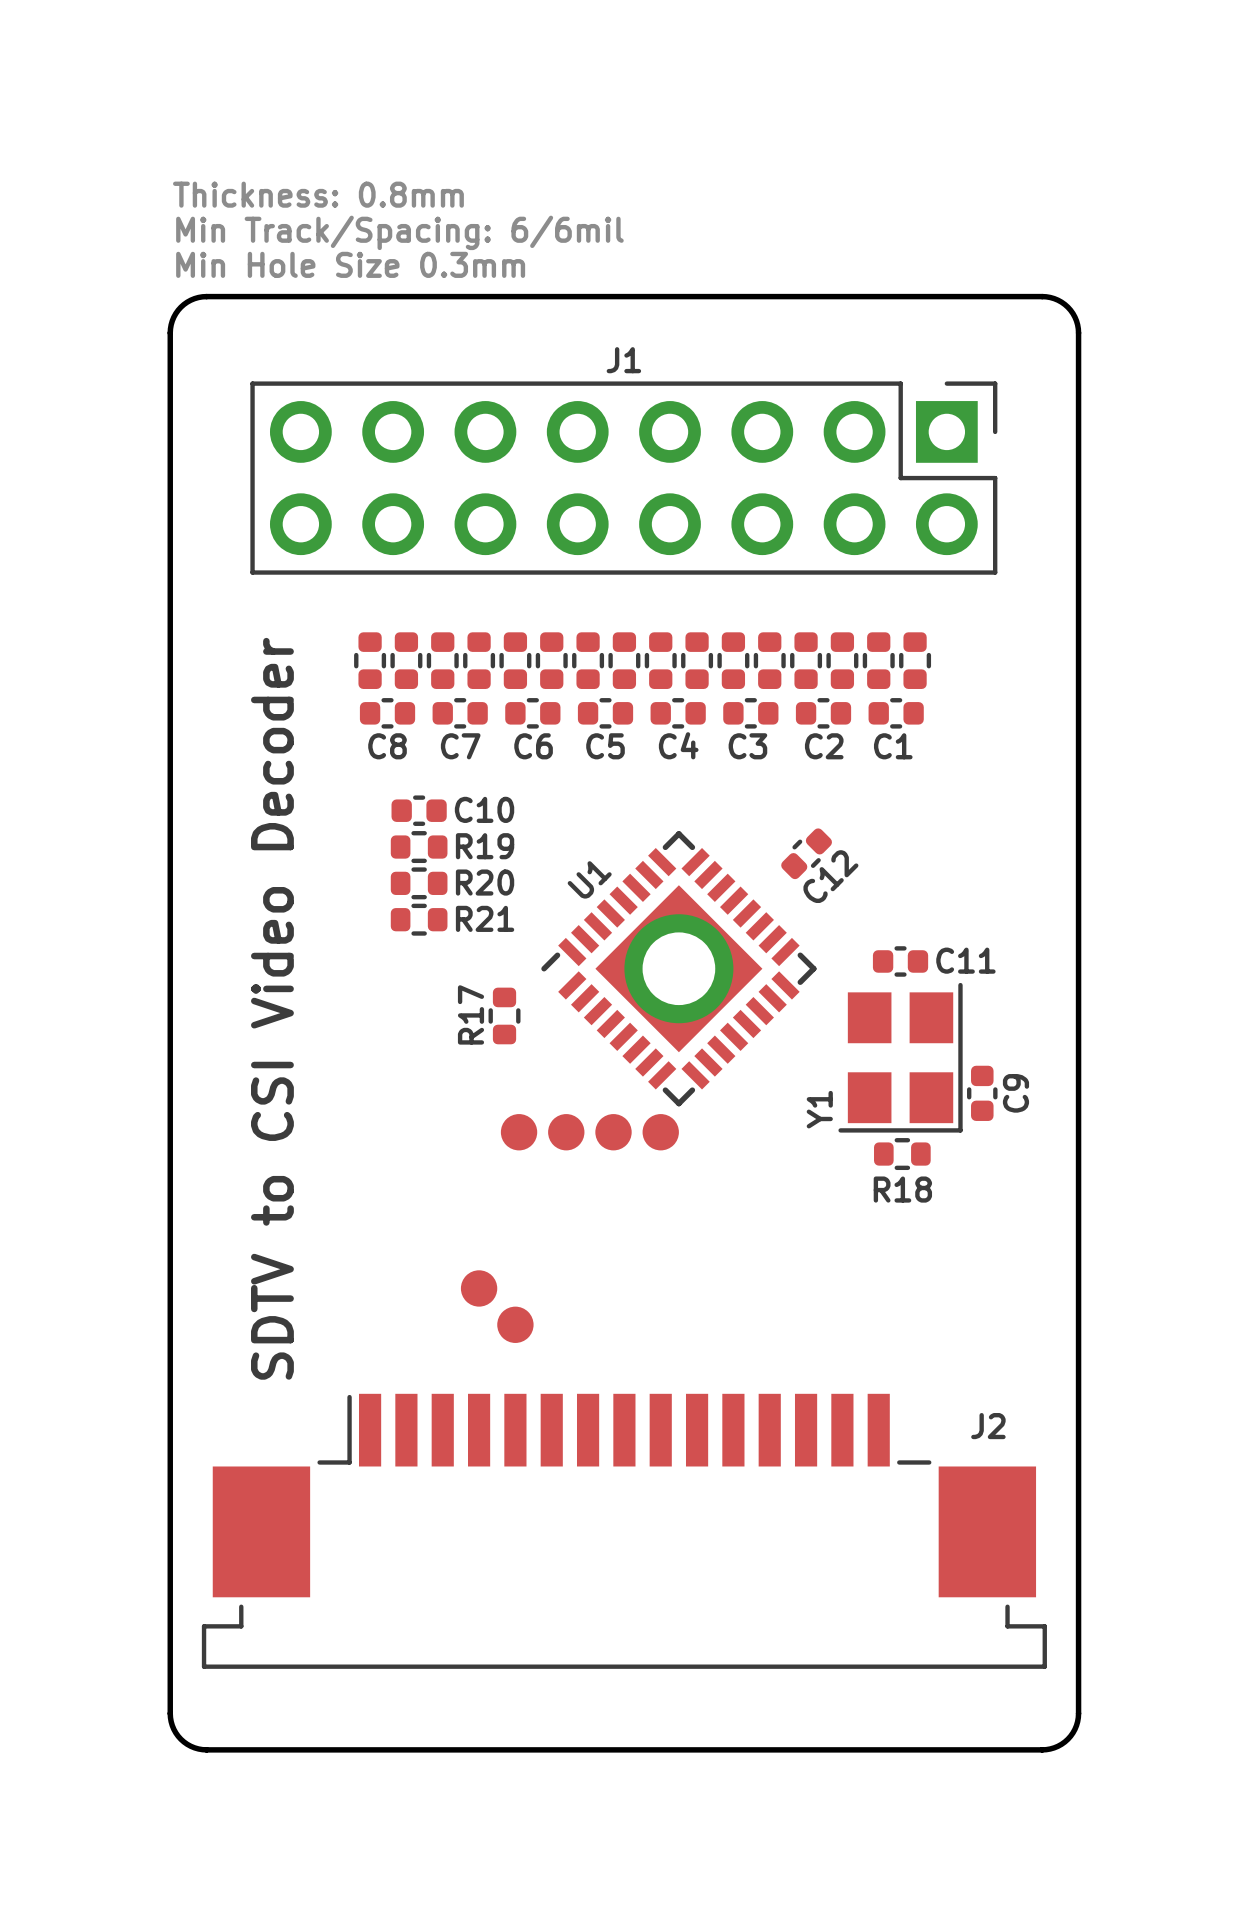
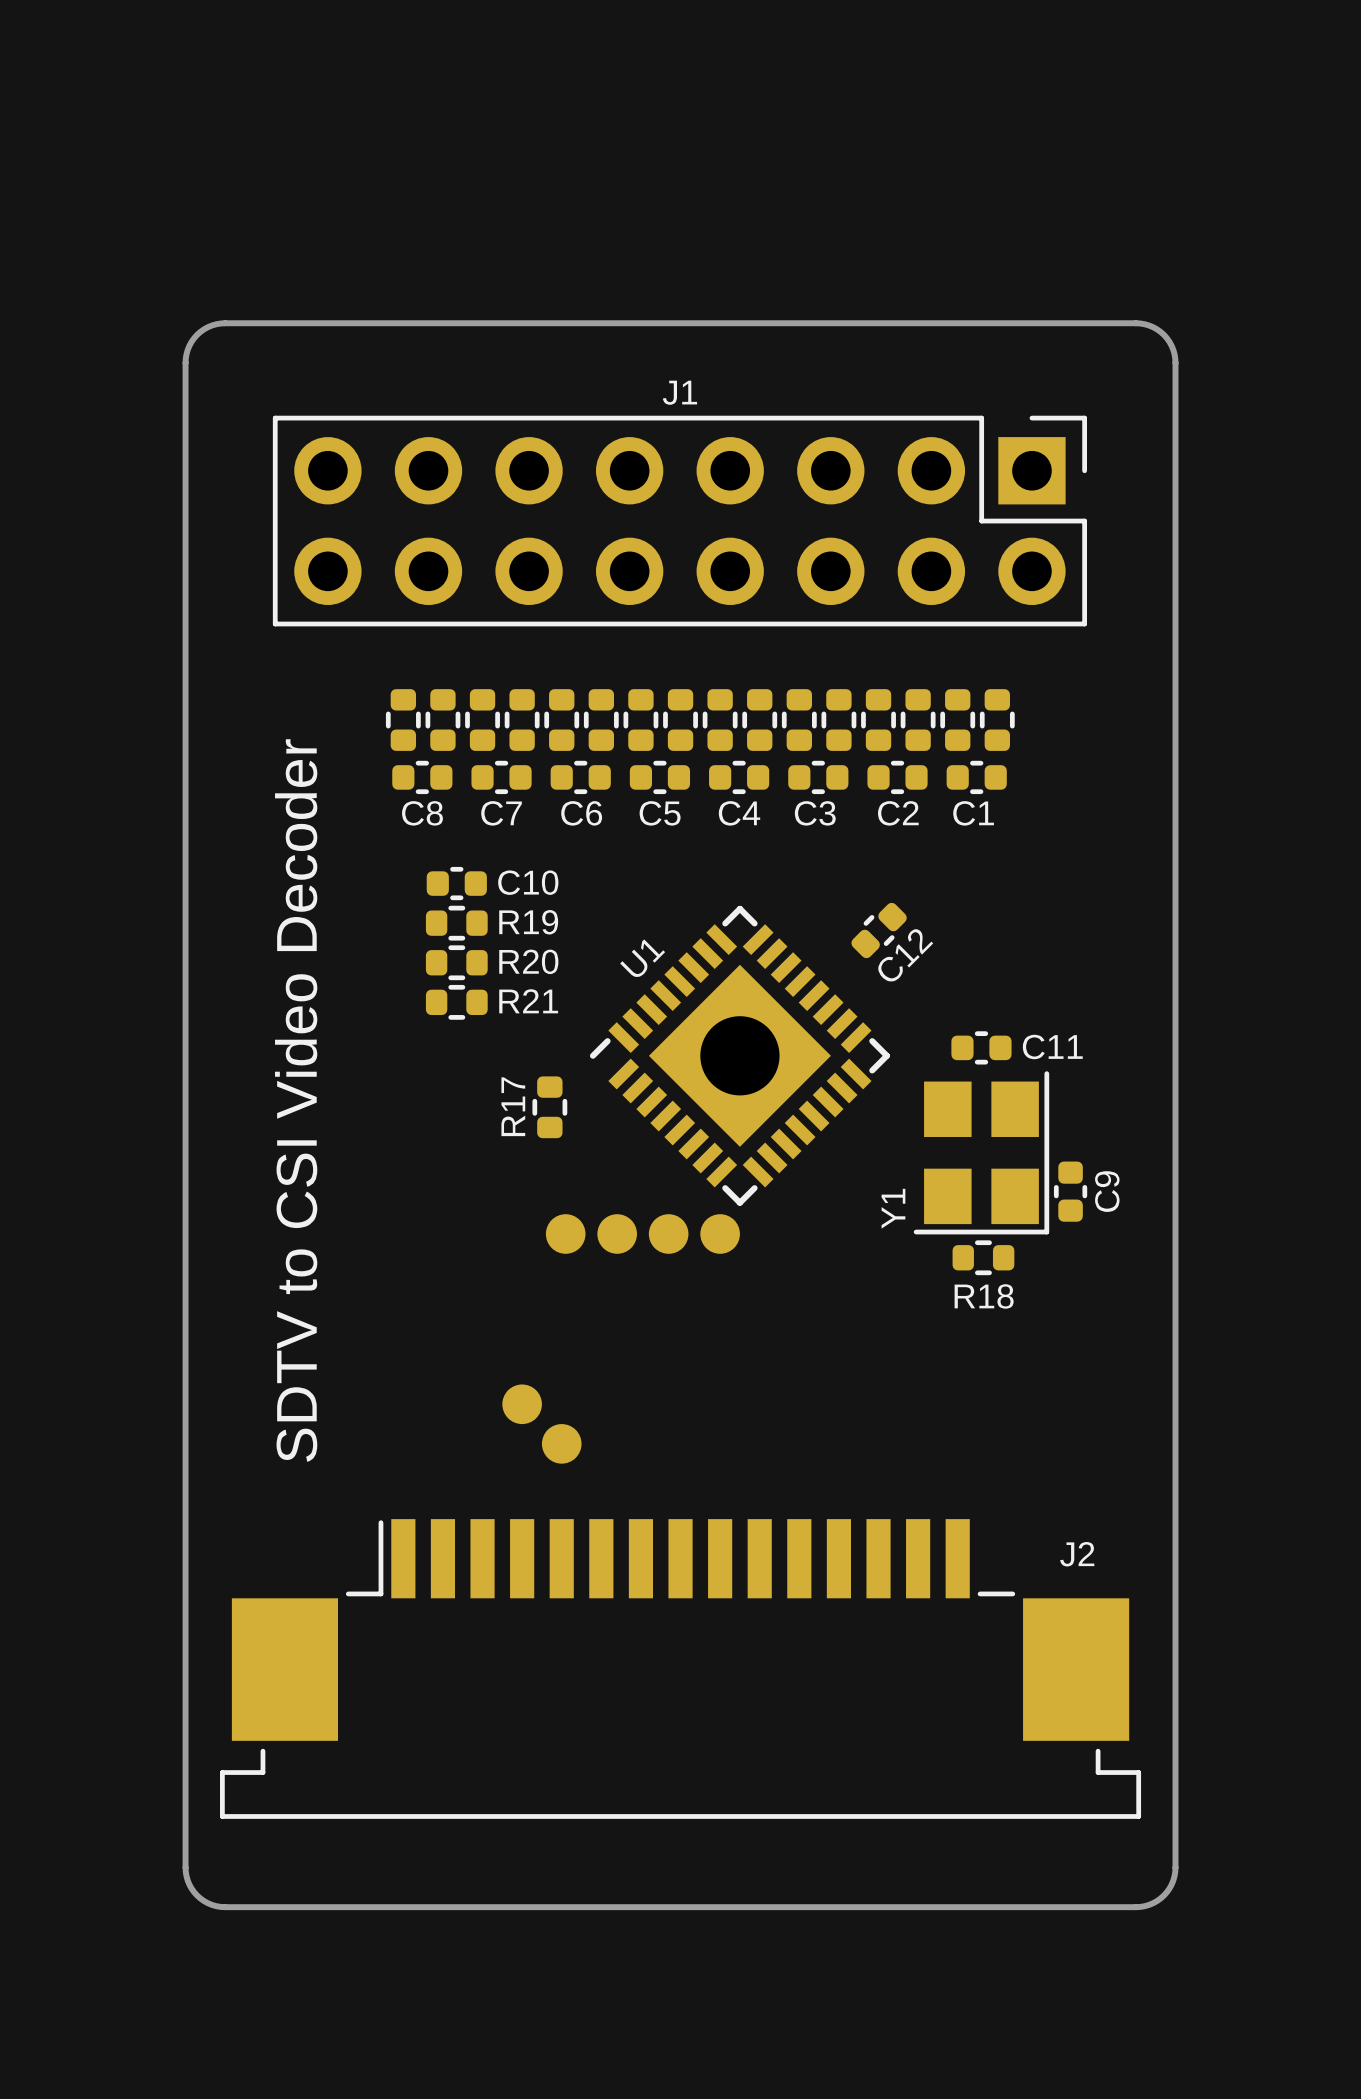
text: Thickness: 0.8mm (318, 194) -> none
text: Min Track/Spacing: 6/6mil (399, 232) -> none
text: Min Hole Size 0.3mm (350, 264) -> none

